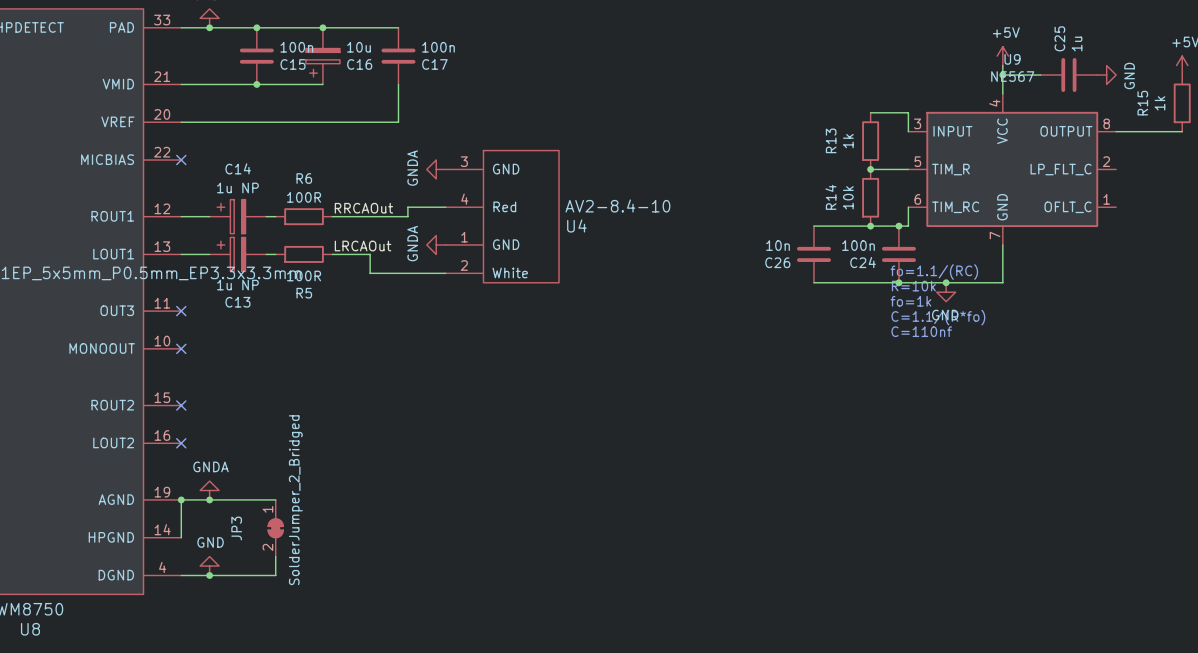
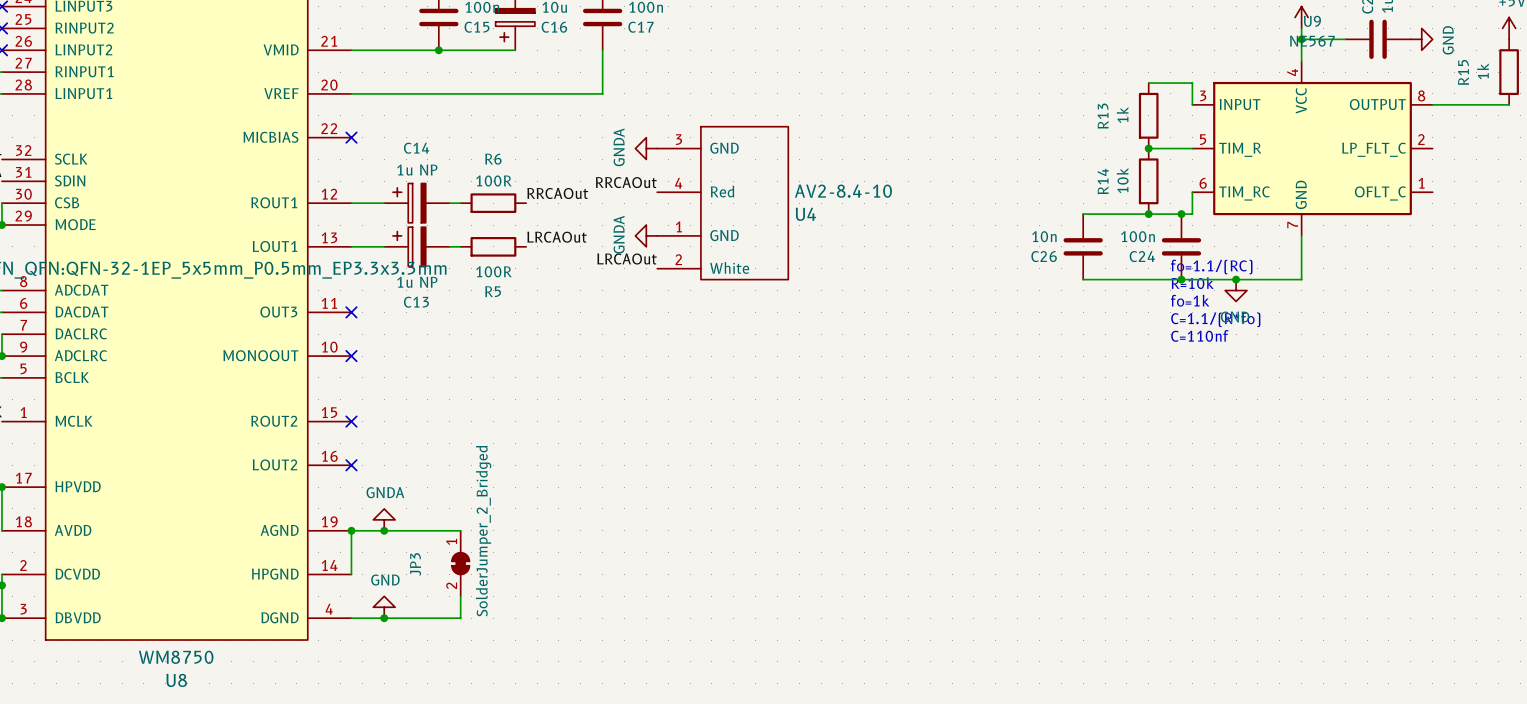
label: none -> RRCAOut (626, 182)
wire: (445, 207) (407, 207) (407, 216) (332, 216) -> none
wire: (332, 254) (370, 254) (370, 273) (445, 273) -> none
label: none -> LRCAOut (627, 259)

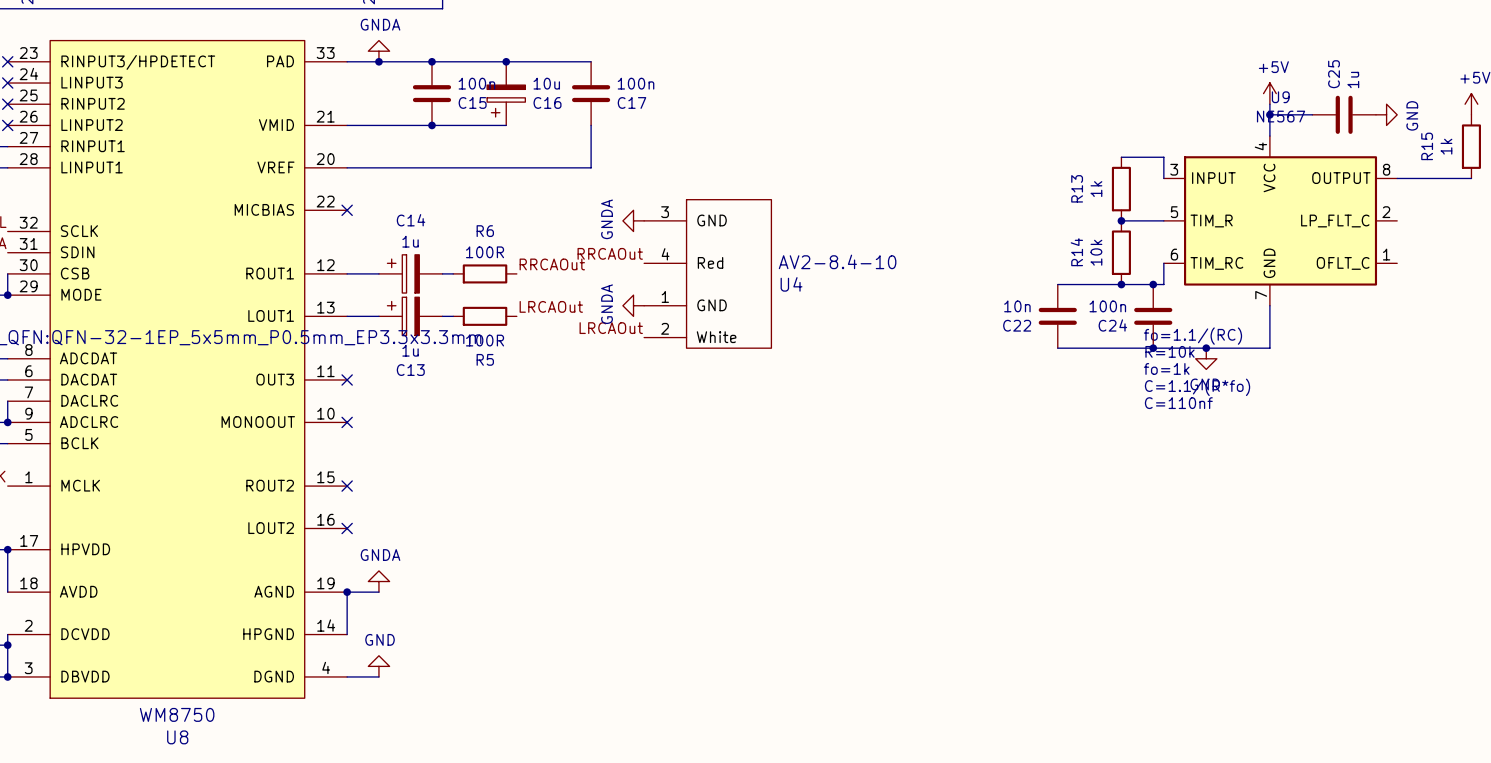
C14 value: 1u NP (417, 170) -> 1u (410, 241)
C26 name: C26 (1044, 256) -> C22 (1017, 325)
C13 value: 1u NP (417, 282) -> 1u (410, 350)
wire: (384, 530) (460, 530) -> none
junction: (384, 530) -> none
JP3: SolderJumper_2_Bridged (460, 563) -> none
wire: (460, 596) (460, 618) (384, 618) -> none
junction: (384, 618) -> none

